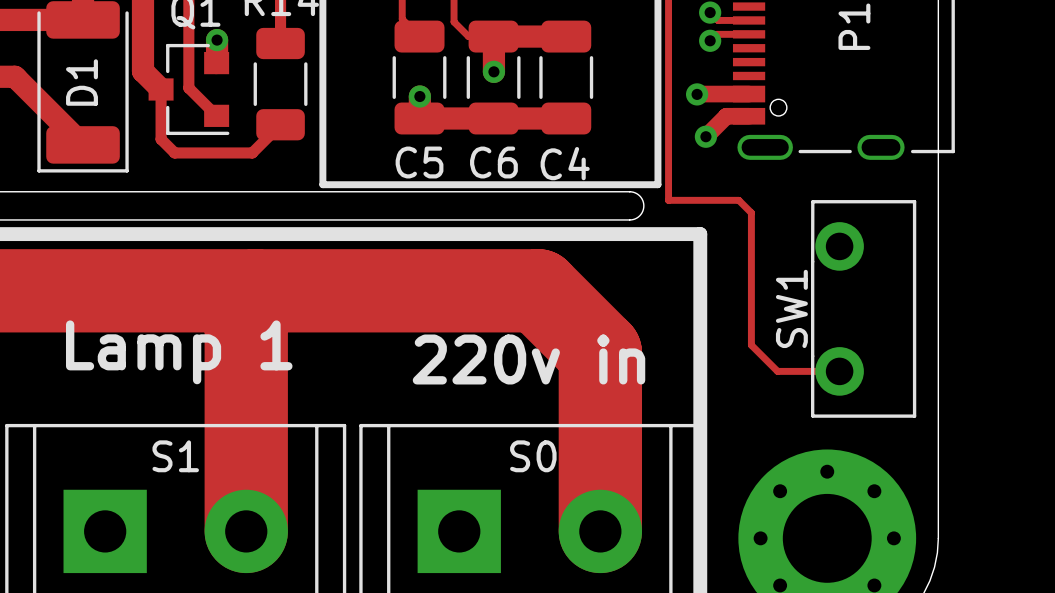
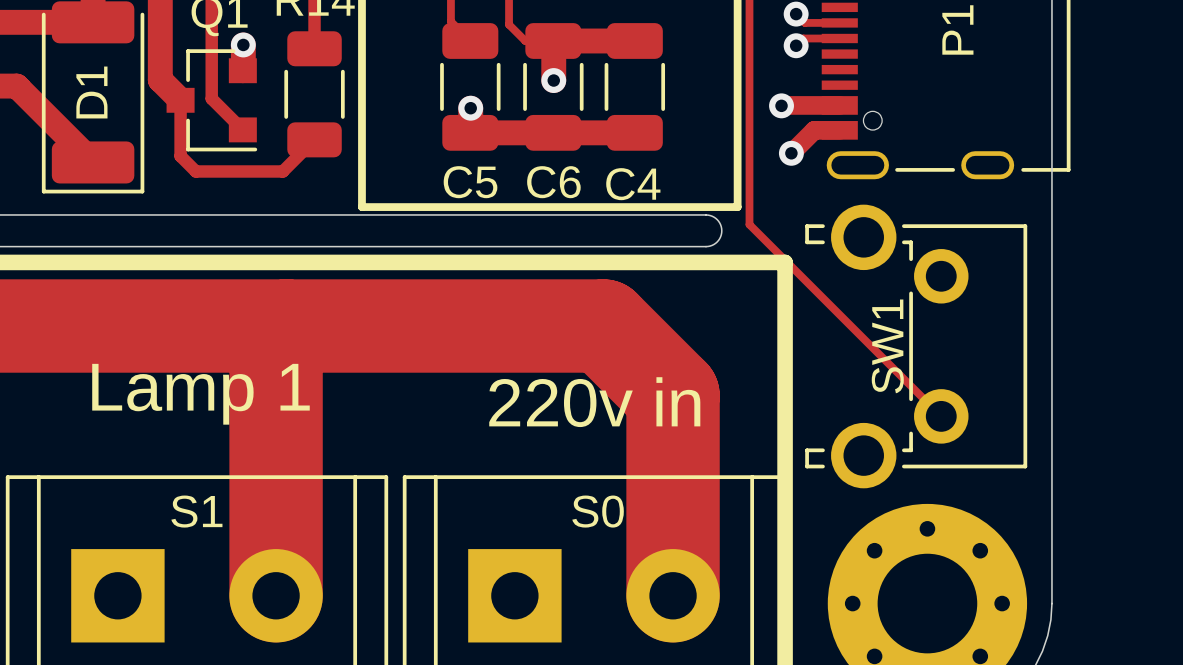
track: (668, 200) (738, 200) (751, 212) (751, 345) (777, 371) (839, 371) -> (749, 224) (941, 416)
SW1 footprint: [810, 200, 917, 418] -> [805, 204, 1028, 489]

